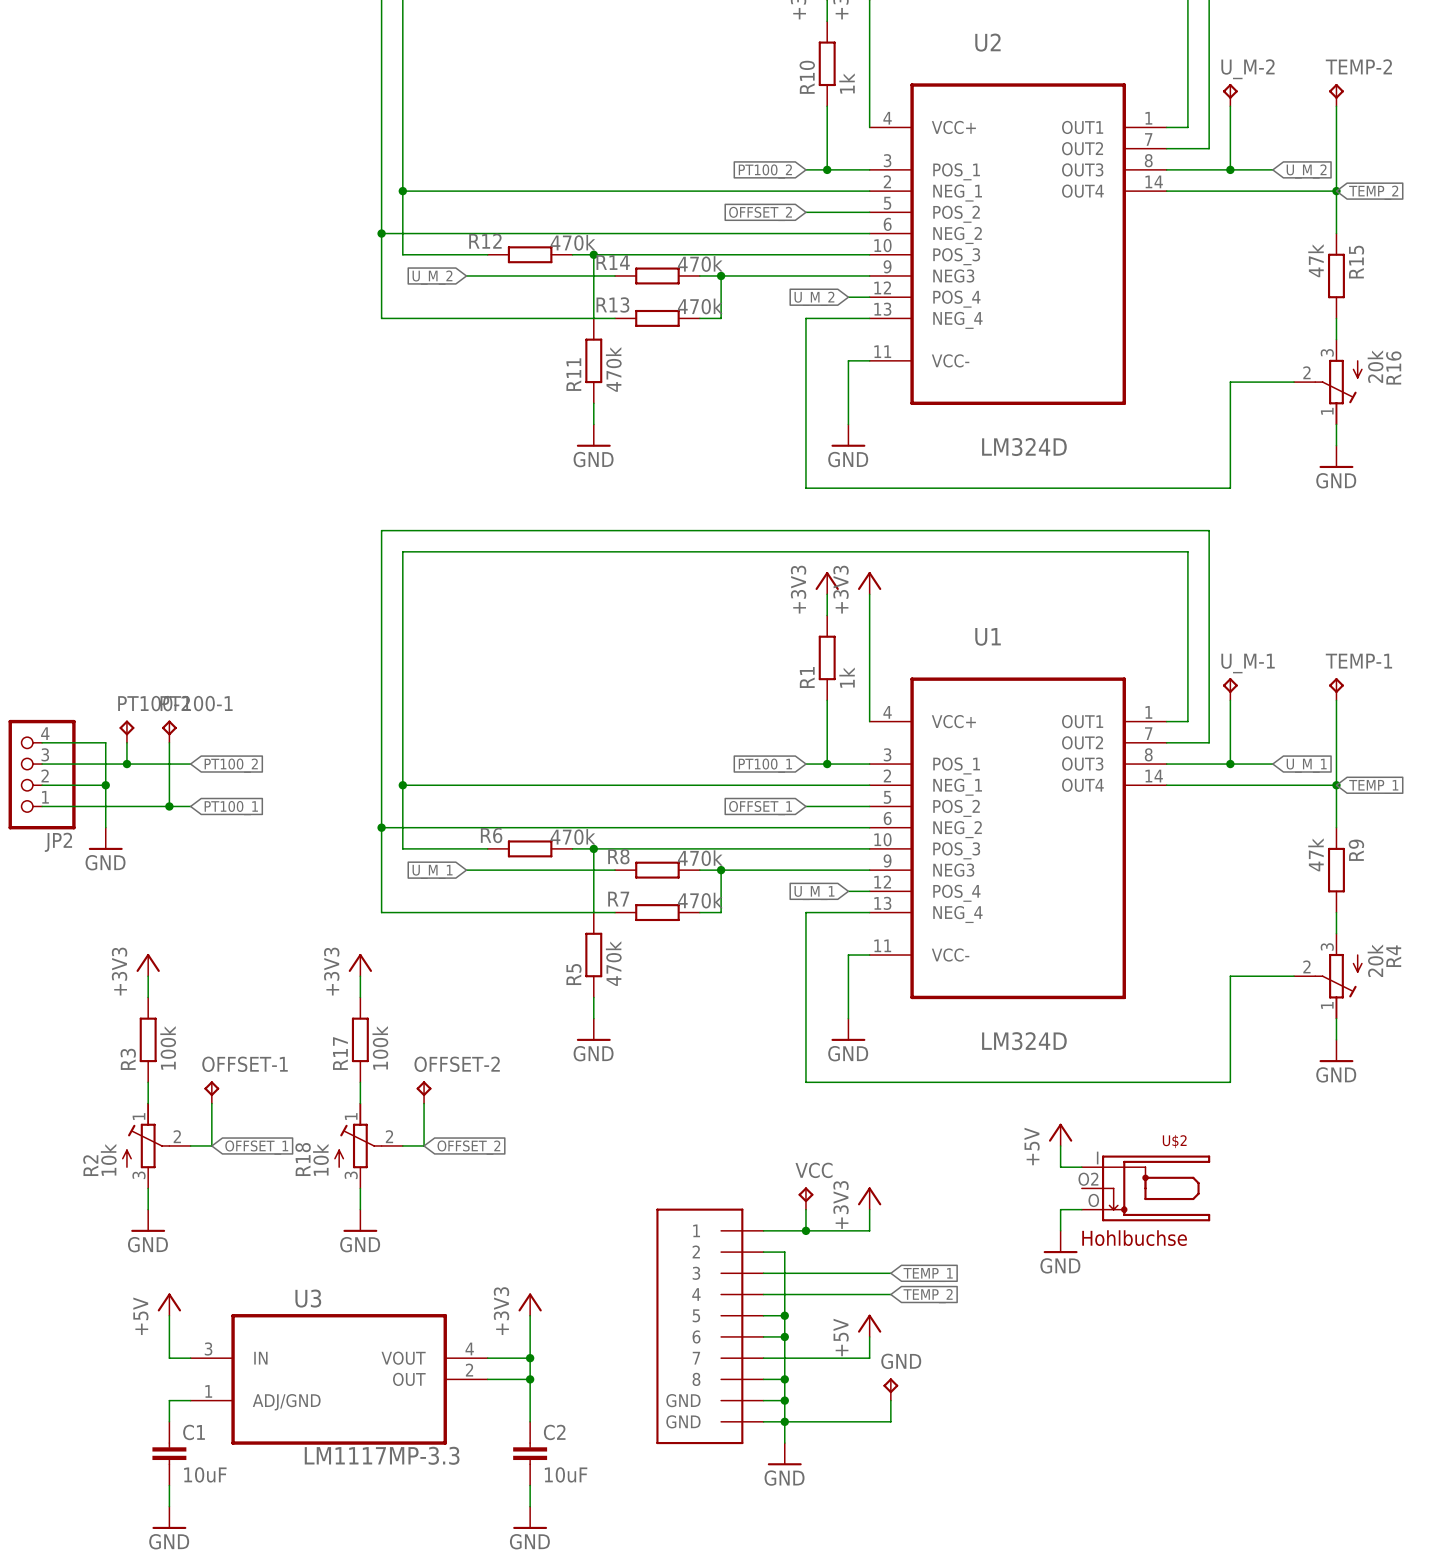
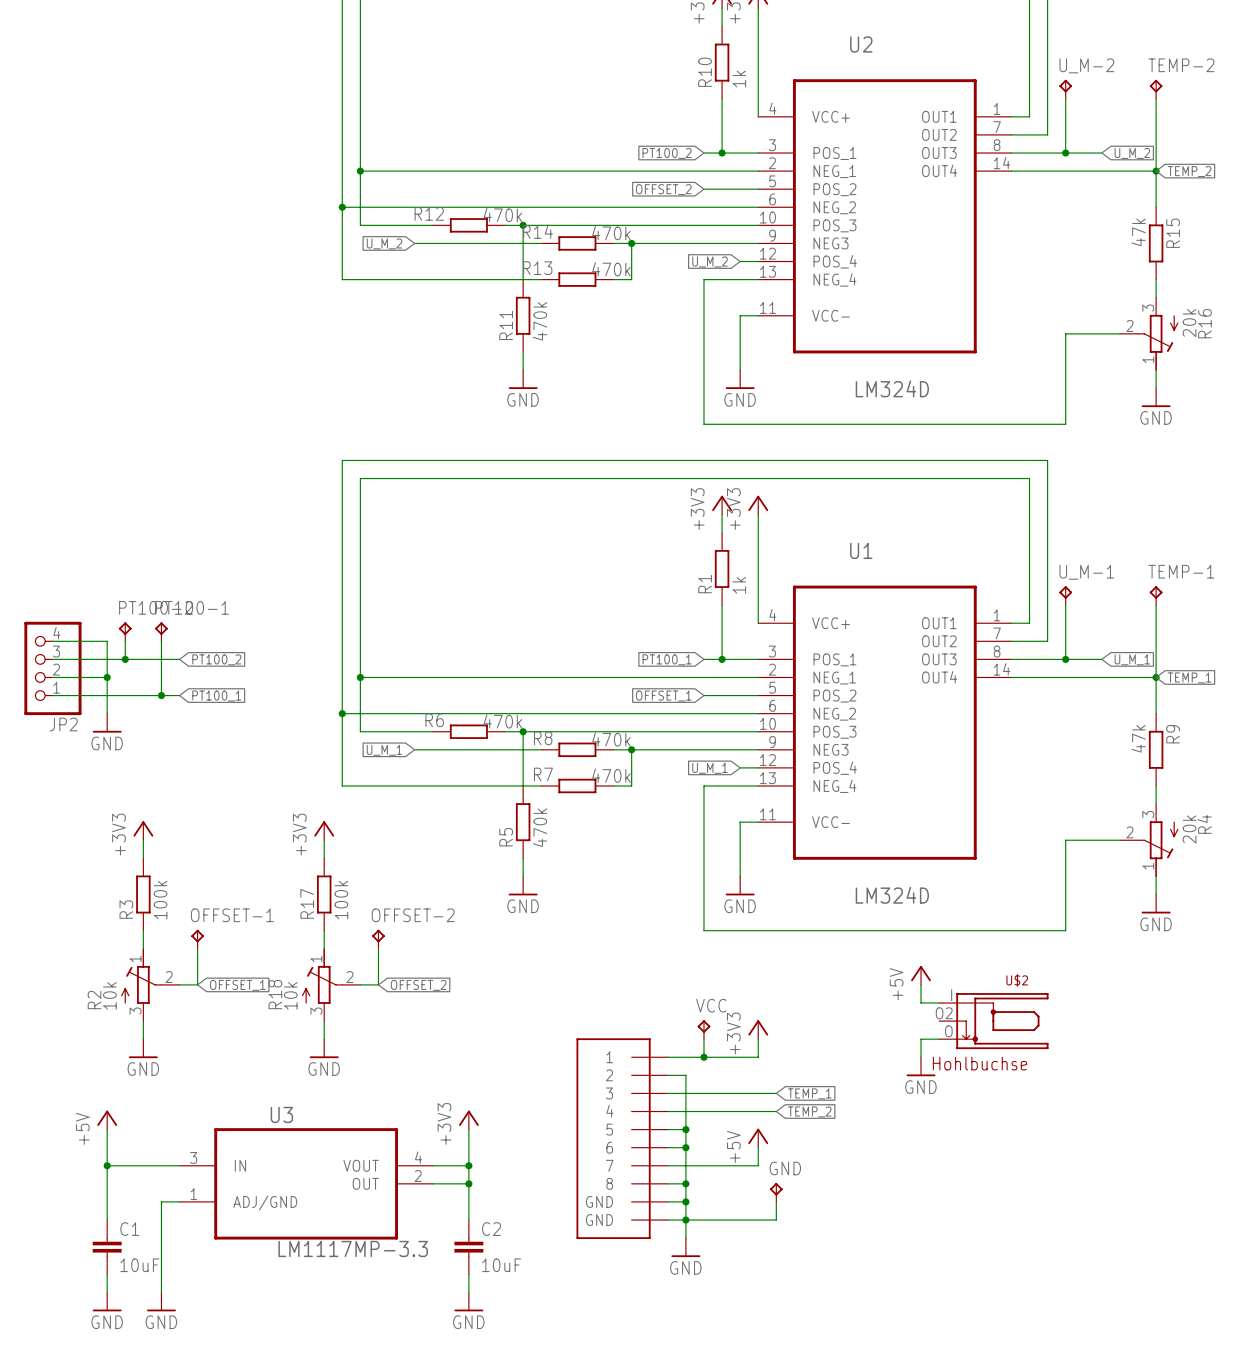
power symbol position: +5V (169, 1304) -> +5V (107, 1120)
wire: none -> (107, 1129) (107, 1220)
wire: (169, 1315) (169, 1358) -> (107, 1165) (161, 1165)
junction: none -> (107, 1165)
C1 position: (169, 1453) -> (107, 1247)
wire: none -> (107, 1274) (107, 1292)
power symbol: none -> GND (107, 1301)

